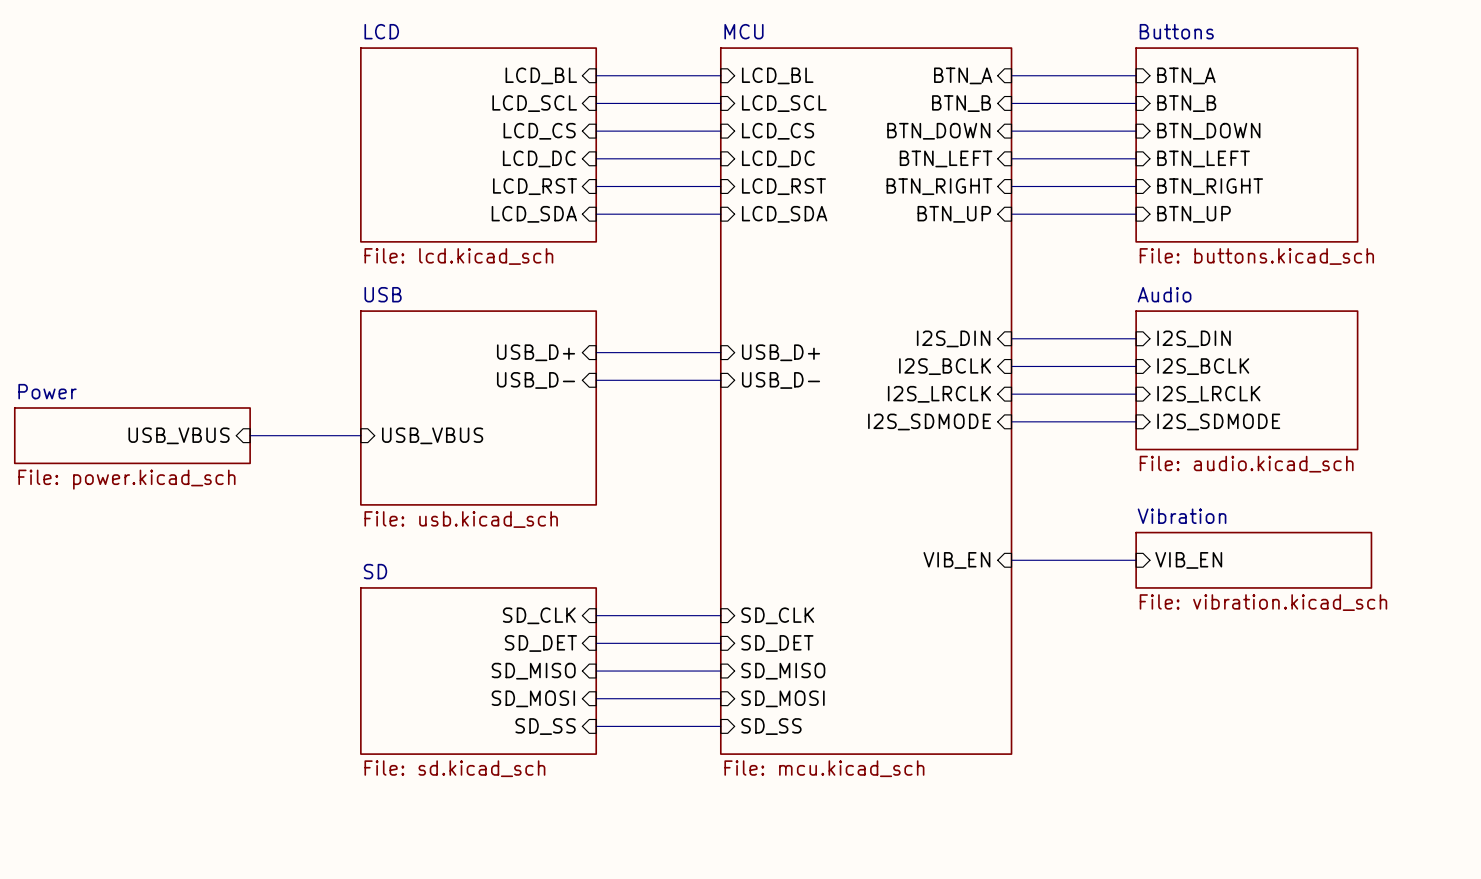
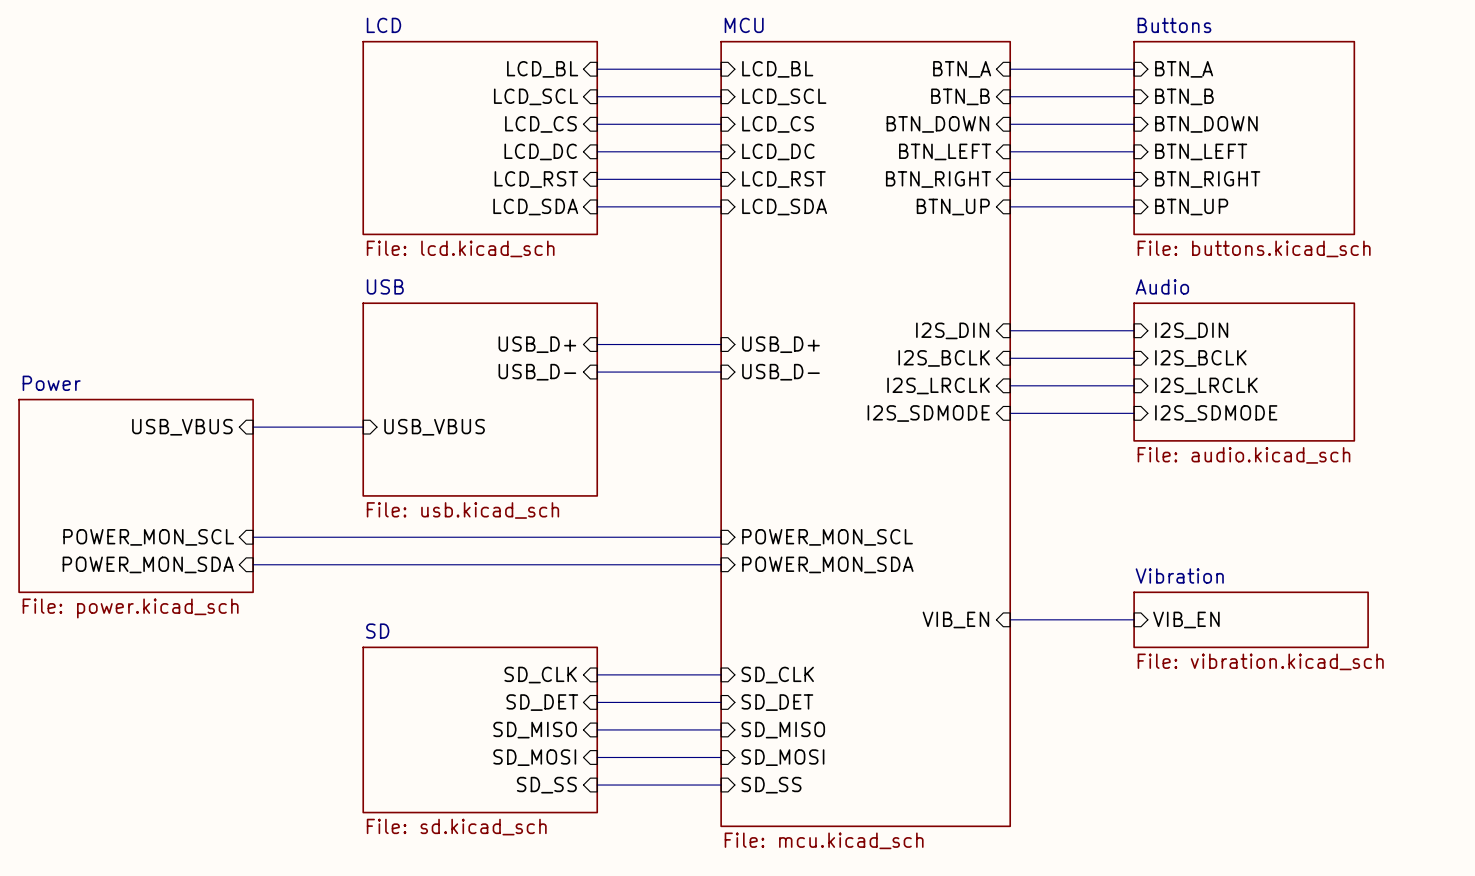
sheet MCU: File: mcu.kicad_sch (866, 401) -> none
sheet Power: File: power.kicad_sch (132, 435) -> none
sheet MCU: none -> File: mcu.kicad_sch (865, 434)
sheet Power: none -> File: power.kicad_sch (136, 495)
sheet pin: none -> POWER_MON_SCL (148, 537)
wire: none -> (253, 537) (721, 537)
sheet pin: none -> POWER_MON_SCL (827, 537)
sheet pin position: VIB_EN (956, 560) -> VIB_EN (955, 619)
wire: (1011, 560) (1136, 560) -> (1010, 619) (1134, 619)
sheet pin position: VIB_EN (1188, 560) -> VIB_EN (1186, 619)
sheet Vibration position: (1253, 560) -> (1251, 619)
sheet pin: none -> POWER_MON_SDA (148, 564)
wire: none -> (253, 564) (721, 564)
sheet pin: none -> POWER_MON_SDA (827, 564)
sheet pin position: SD_CLK (539, 615) -> SD_CLK (540, 675)
wire: (596, 615) (720, 615) -> (597, 674) (721, 674)
sheet pin position: SD_CLK (777, 615) -> SD_CLK (777, 675)
sheet pin position: SD_DET (540, 643) -> SD_DET (542, 702)
wire: (596, 643) (720, 643) -> (597, 702) (721, 702)
sheet pin position: SD_DET (777, 643) -> SD_DET (777, 702)
sheet SD position: (478, 671) -> (480, 729)
sheet pin position: SD_MISO (533, 671) -> SD_MISO (535, 730)
wire: (596, 671) (720, 671) -> (597, 729) (721, 729)
sheet pin position: SD_MISO (783, 671) -> SD_MISO (783, 730)
sheet pin position: SD_MOSI (533, 698) -> SD_MOSI (534, 757)
wire: (596, 698) (720, 698) -> (597, 757) (721, 757)
sheet pin position: SD_MOSI (782, 698) -> SD_MOSI (782, 757)
sheet pin position: SD_SS (545, 726) -> SD_SS (546, 785)
wire: (596, 726) (720, 726) -> (597, 785) (721, 785)
sheet pin position: SD_SS (771, 726) -> SD_SS (771, 785)

